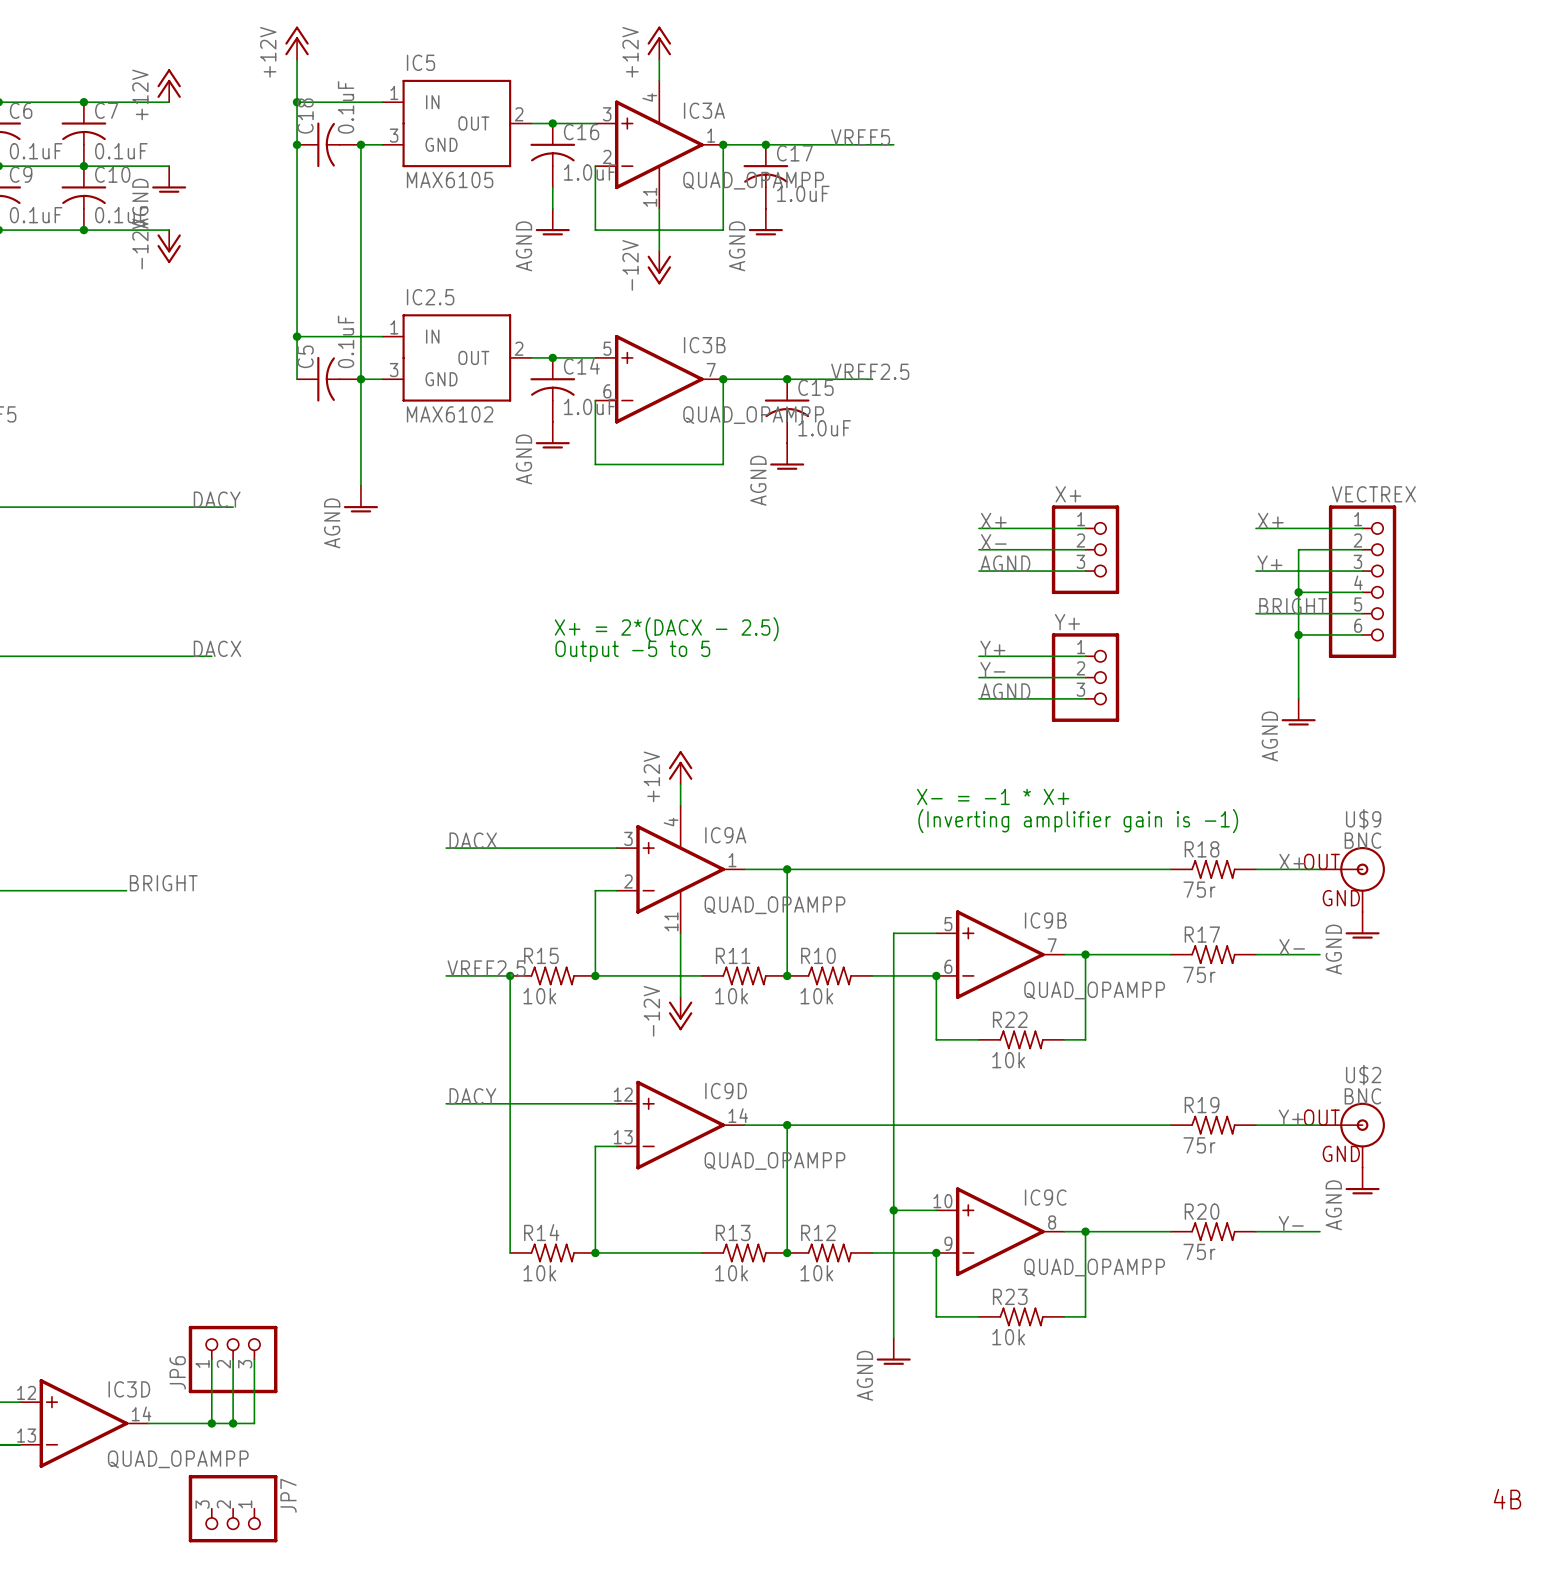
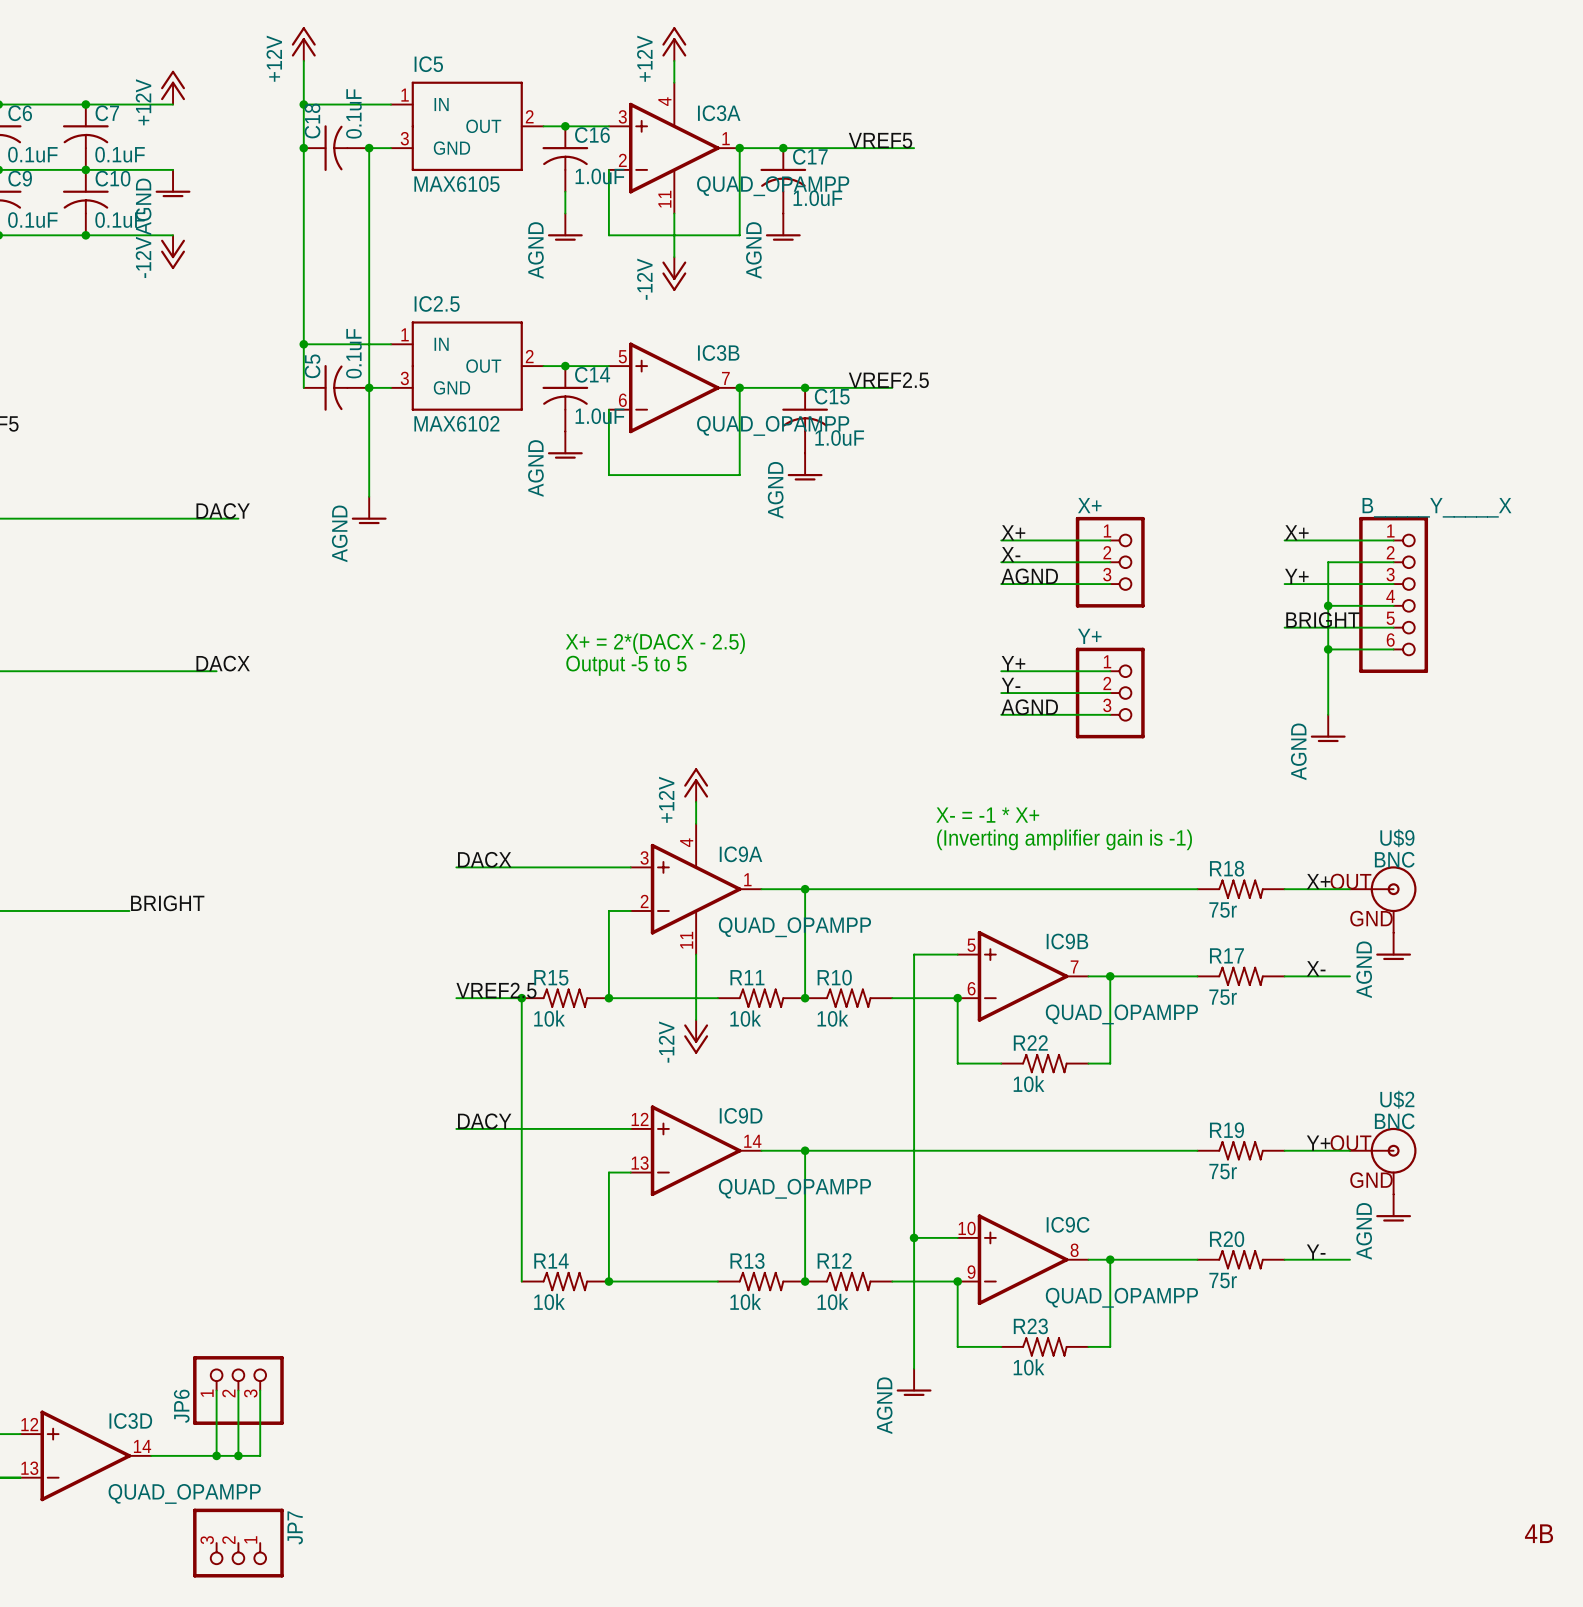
VECTREX name: VECTREX (1373, 494) -> B_____Y_____X (1436, 507)

